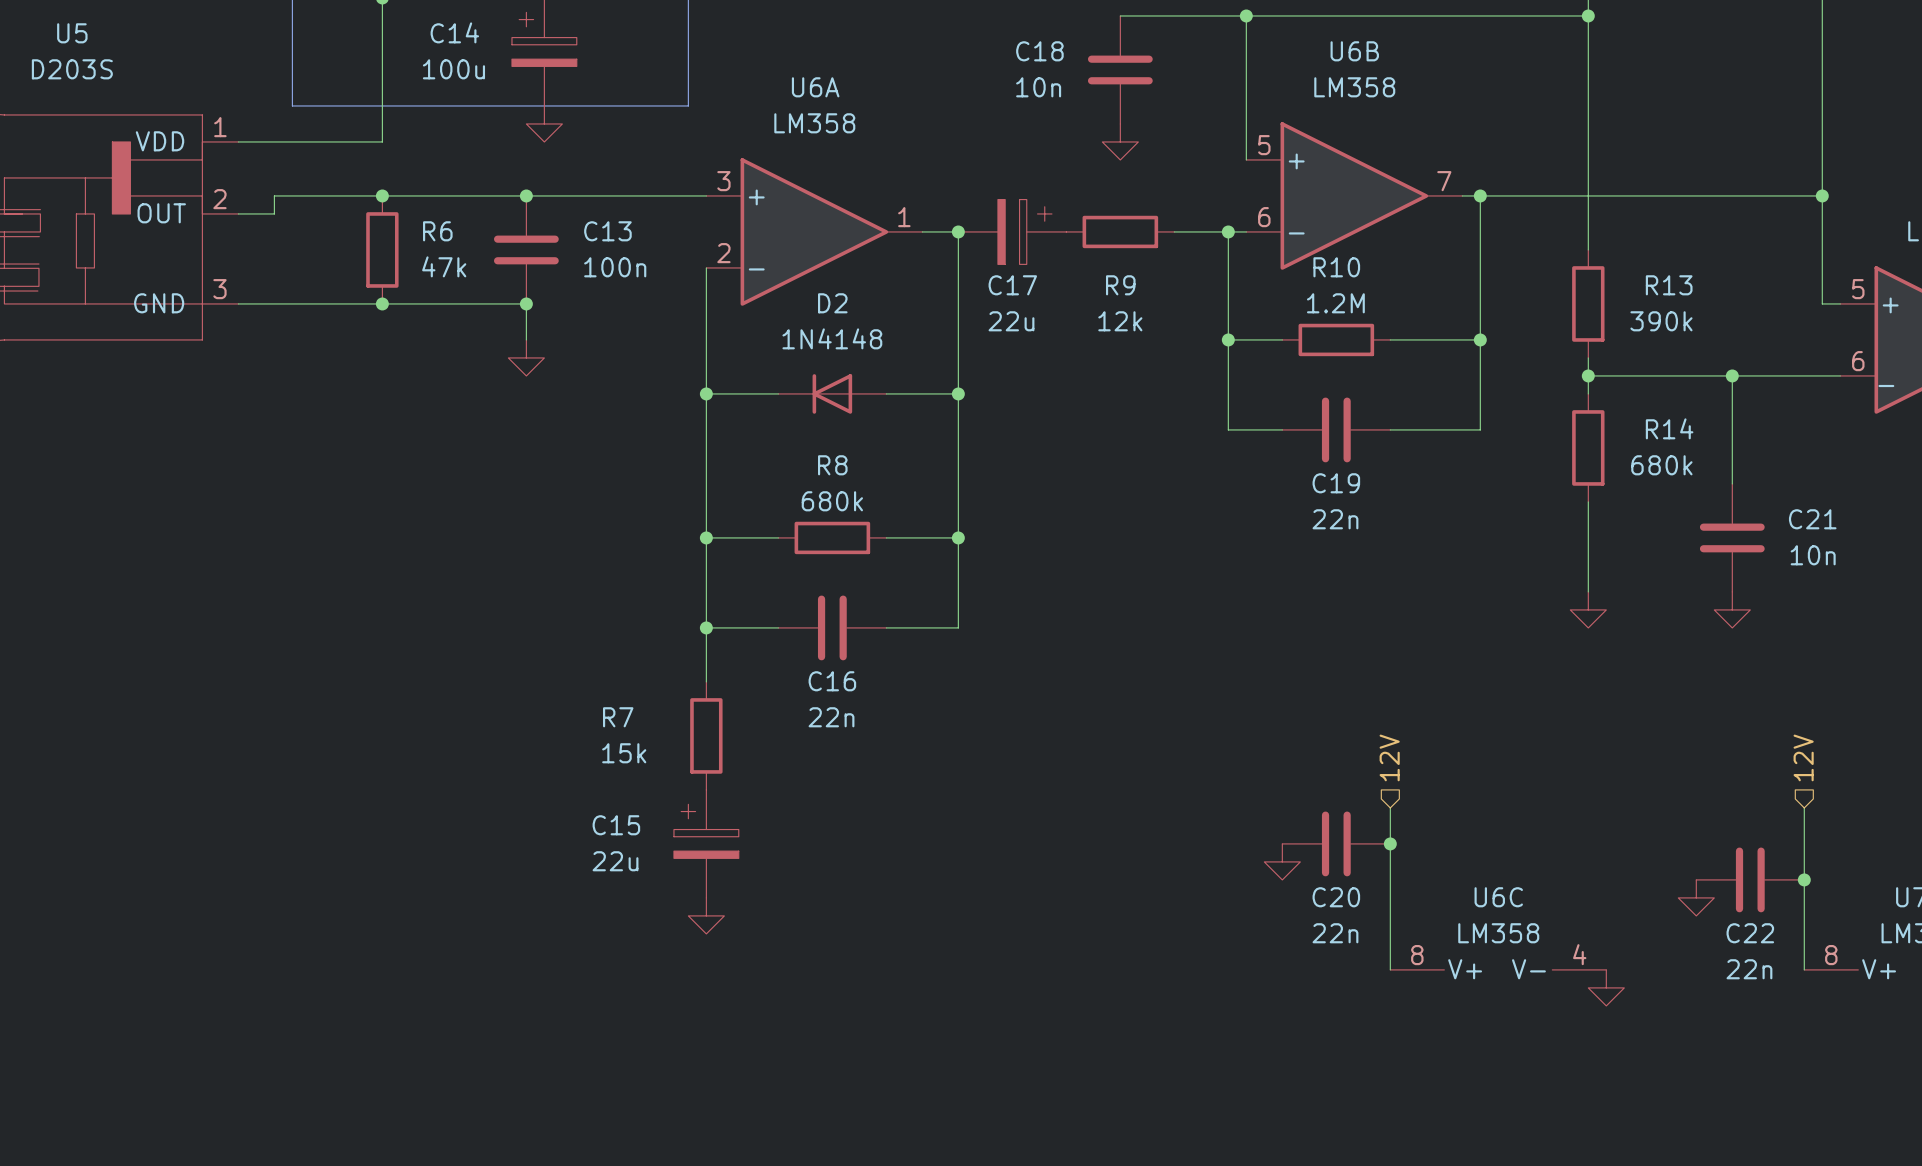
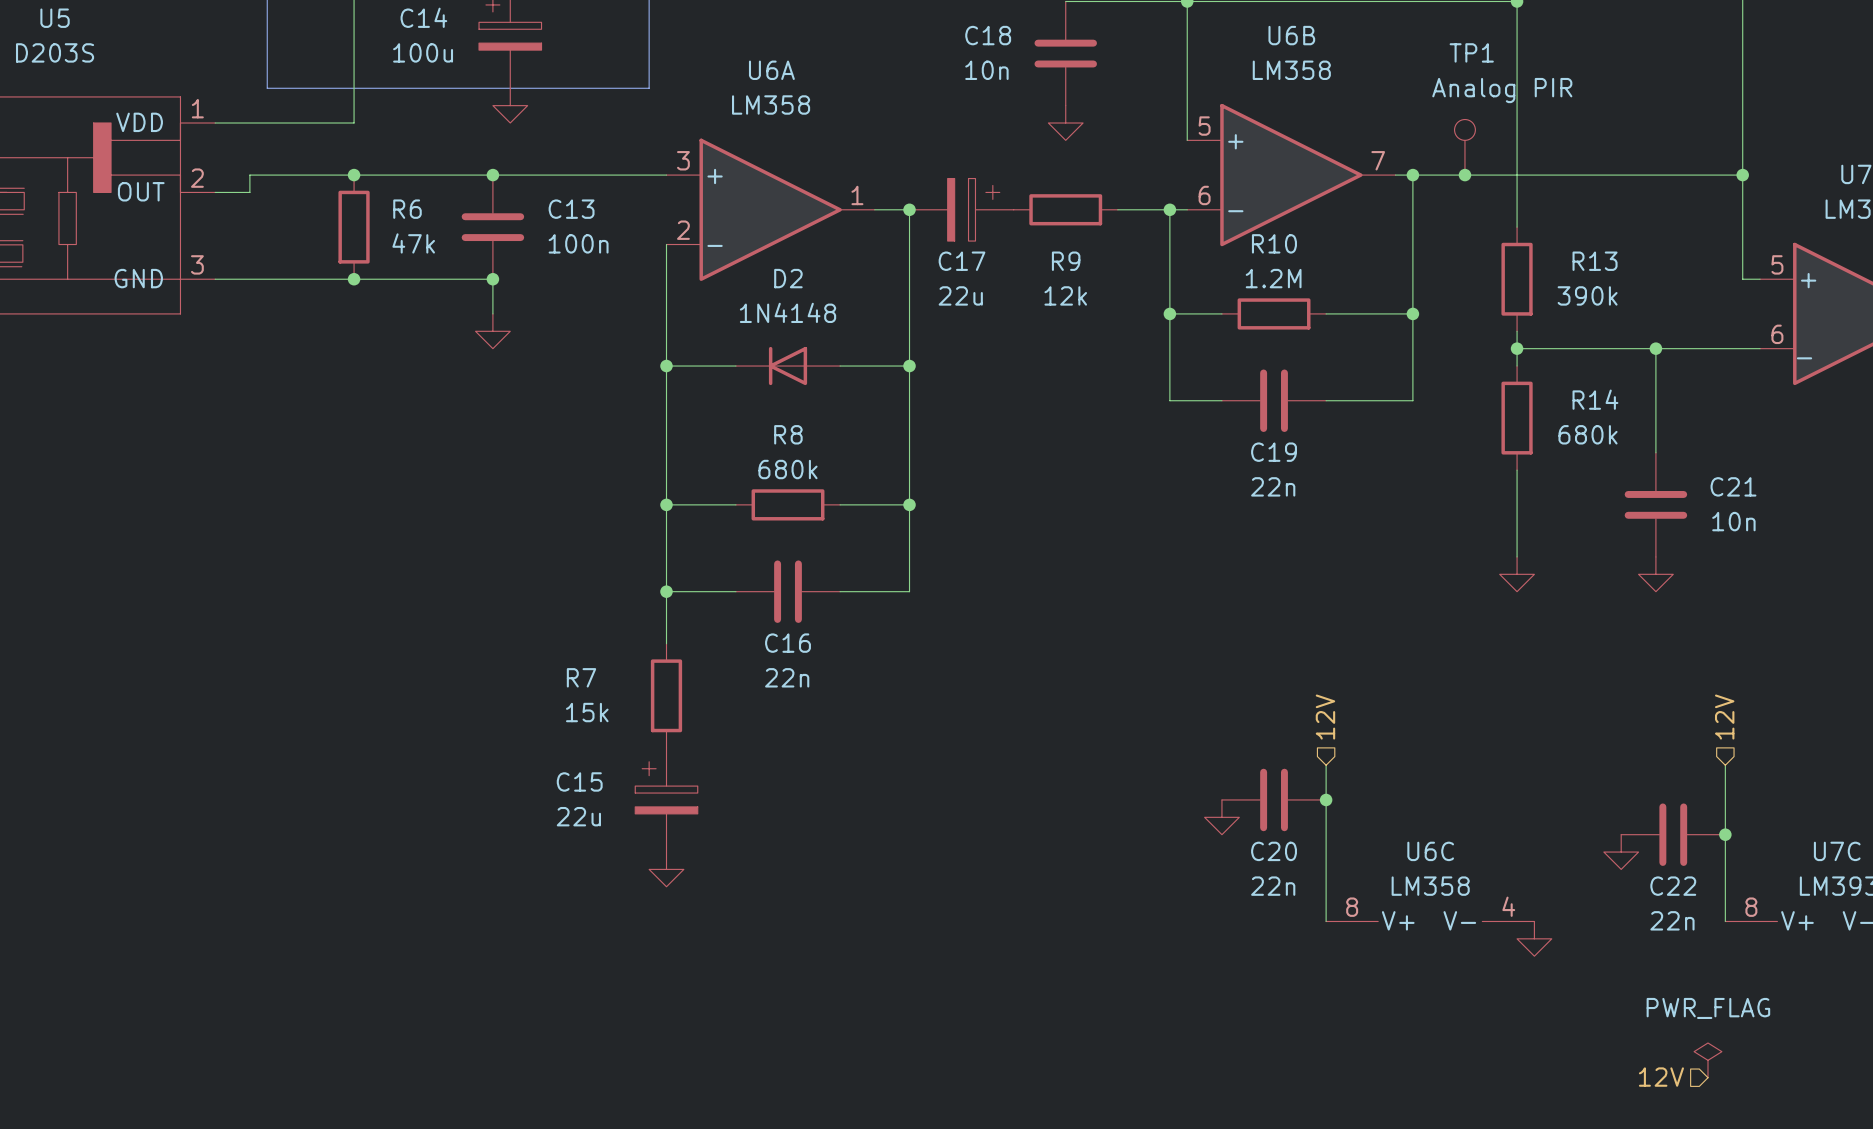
TP1: none -> Analog PIR (1464, 147)
junction: none -> (1464, 175)
power symbol: none -> PWR_FLAG (1707, 1060)
hierarchical label: none -> 12V (1661, 1077)

